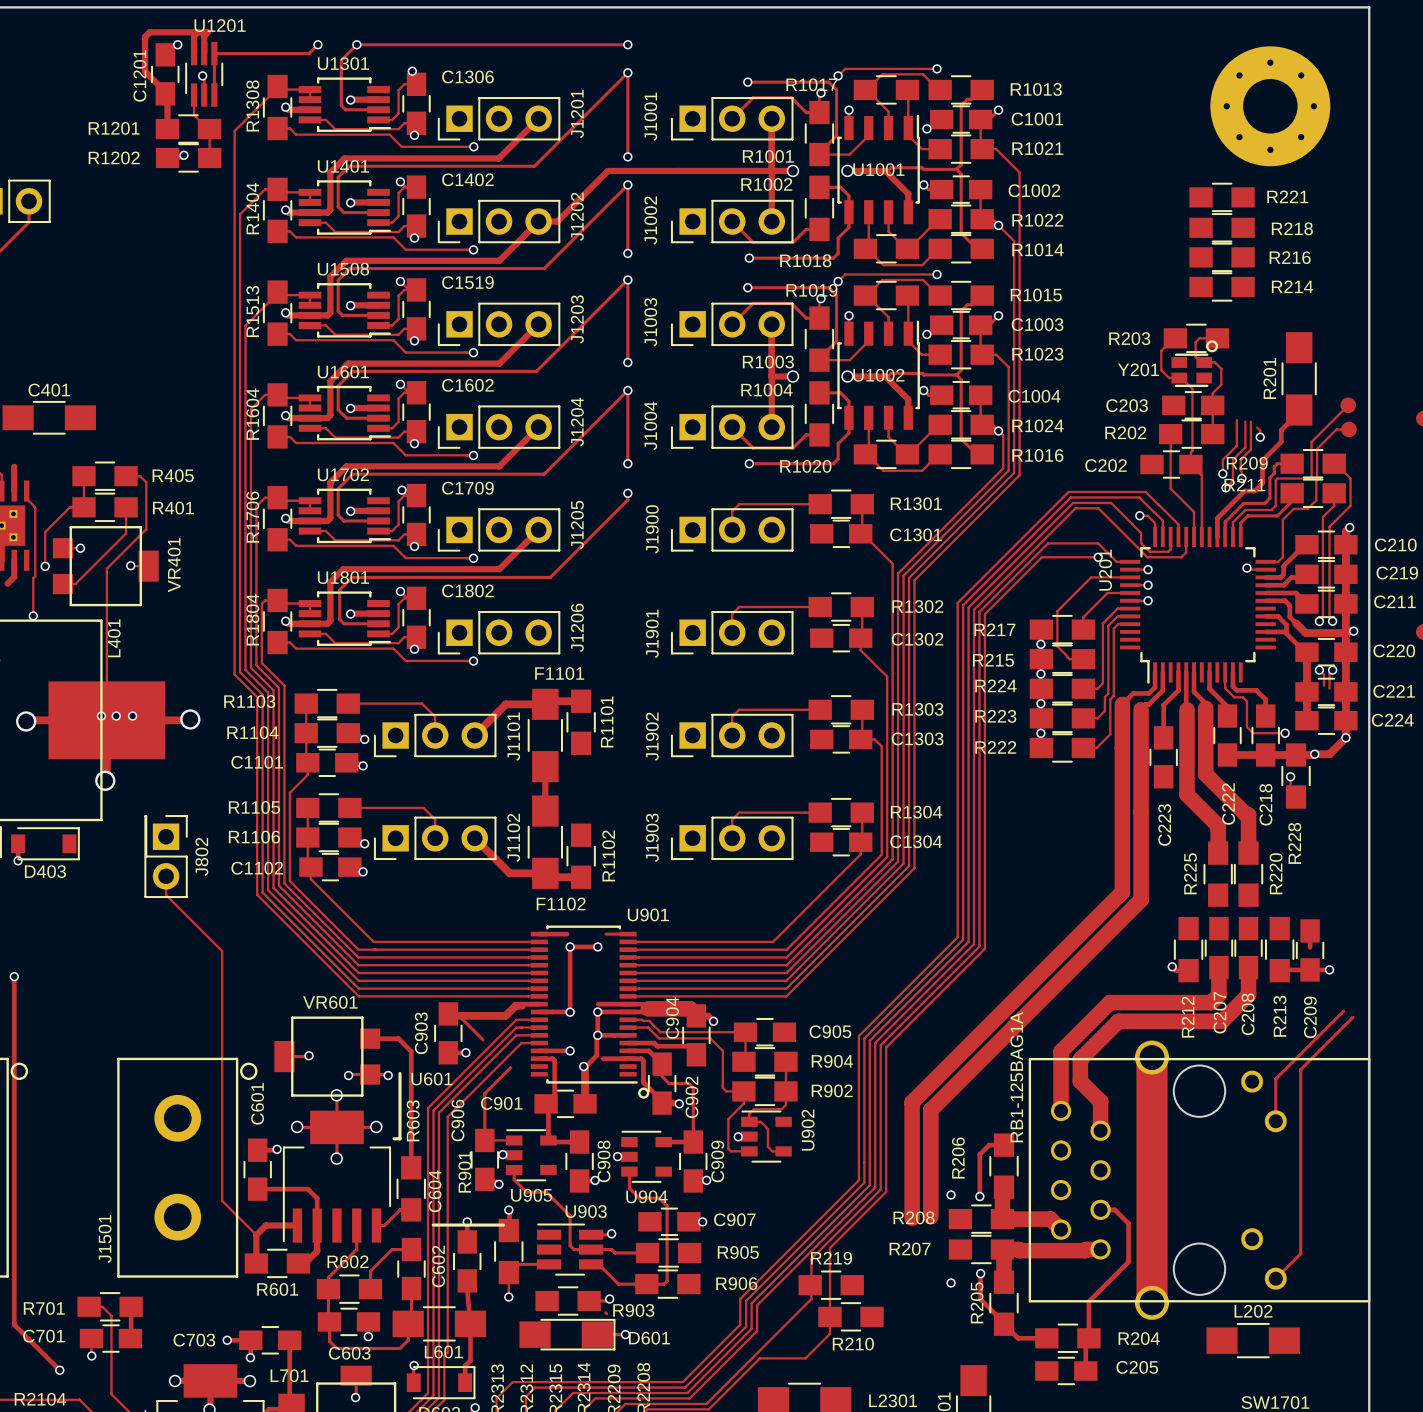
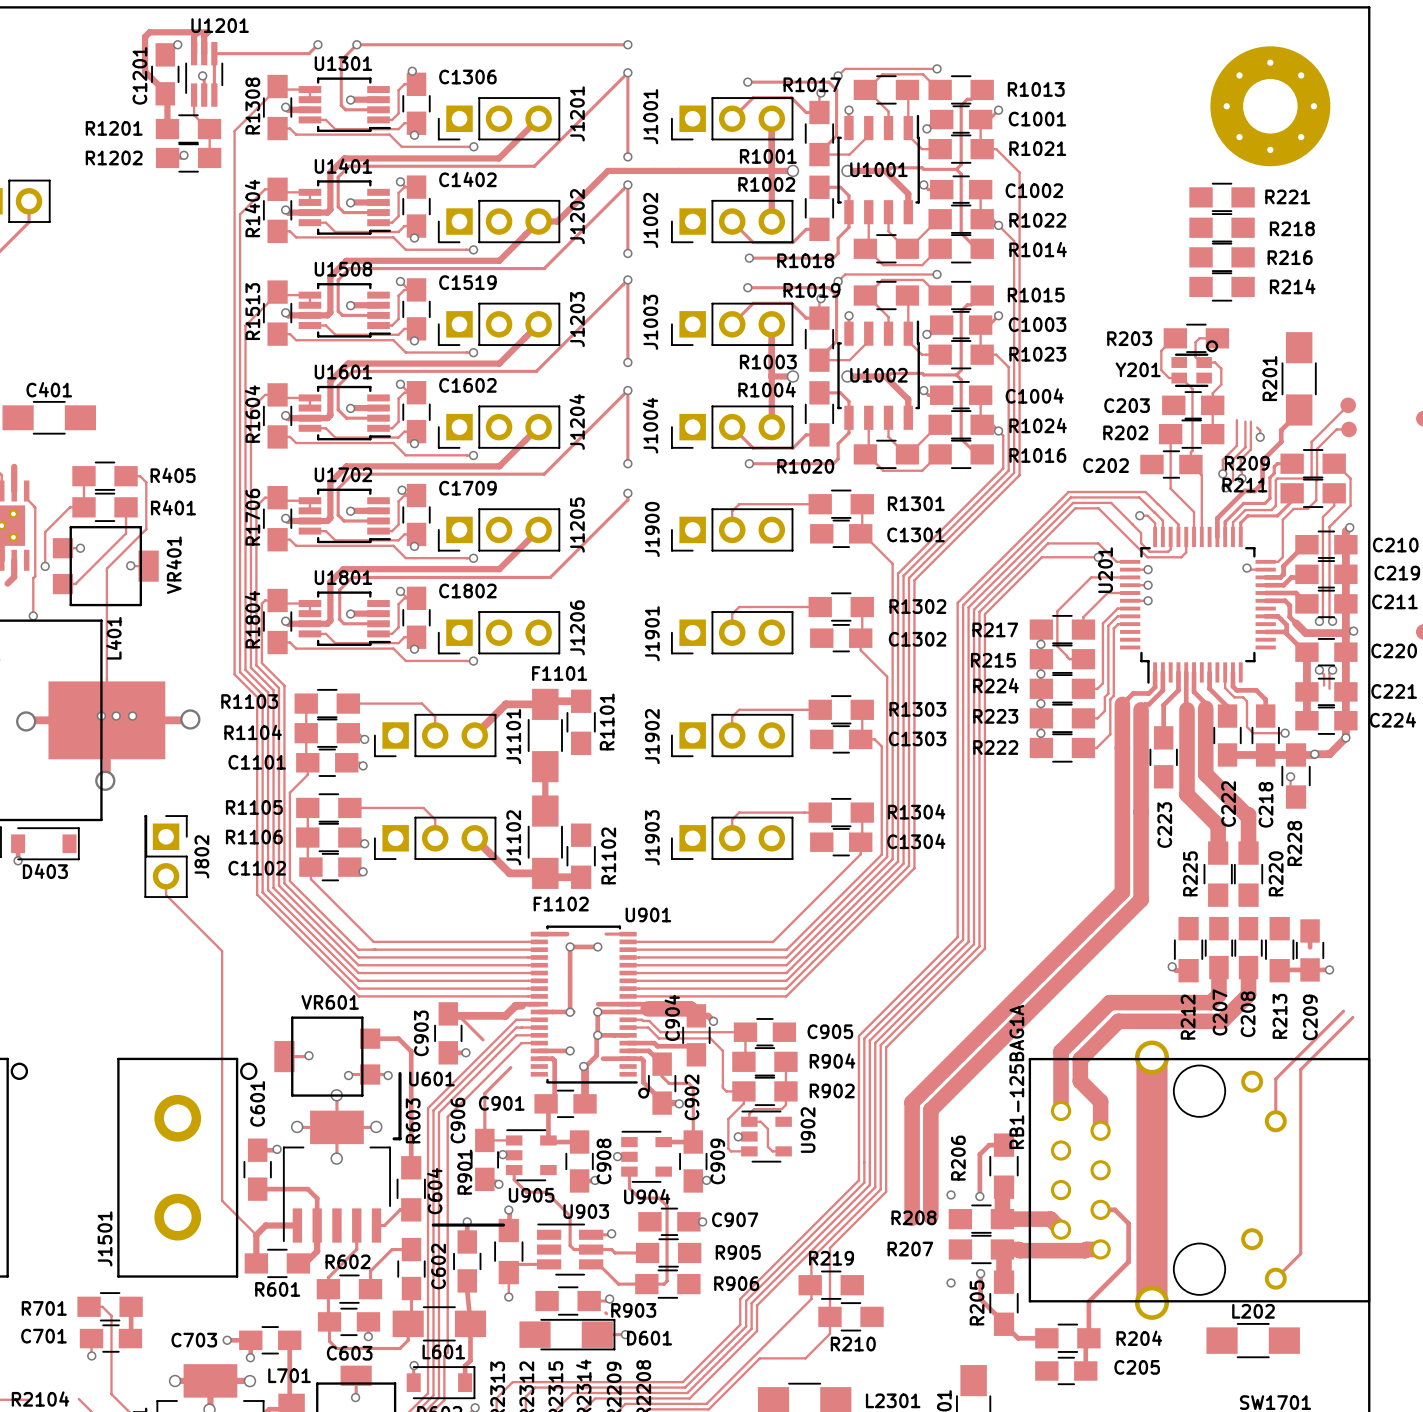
track: (14, 976) (14, 1324) (59, 1370) -> none
via: (14, 976) -> none
via: (59, 1370) -> none
track: (29, 1399) (79, 1399) -> (78, 1399) (79, 1399)

